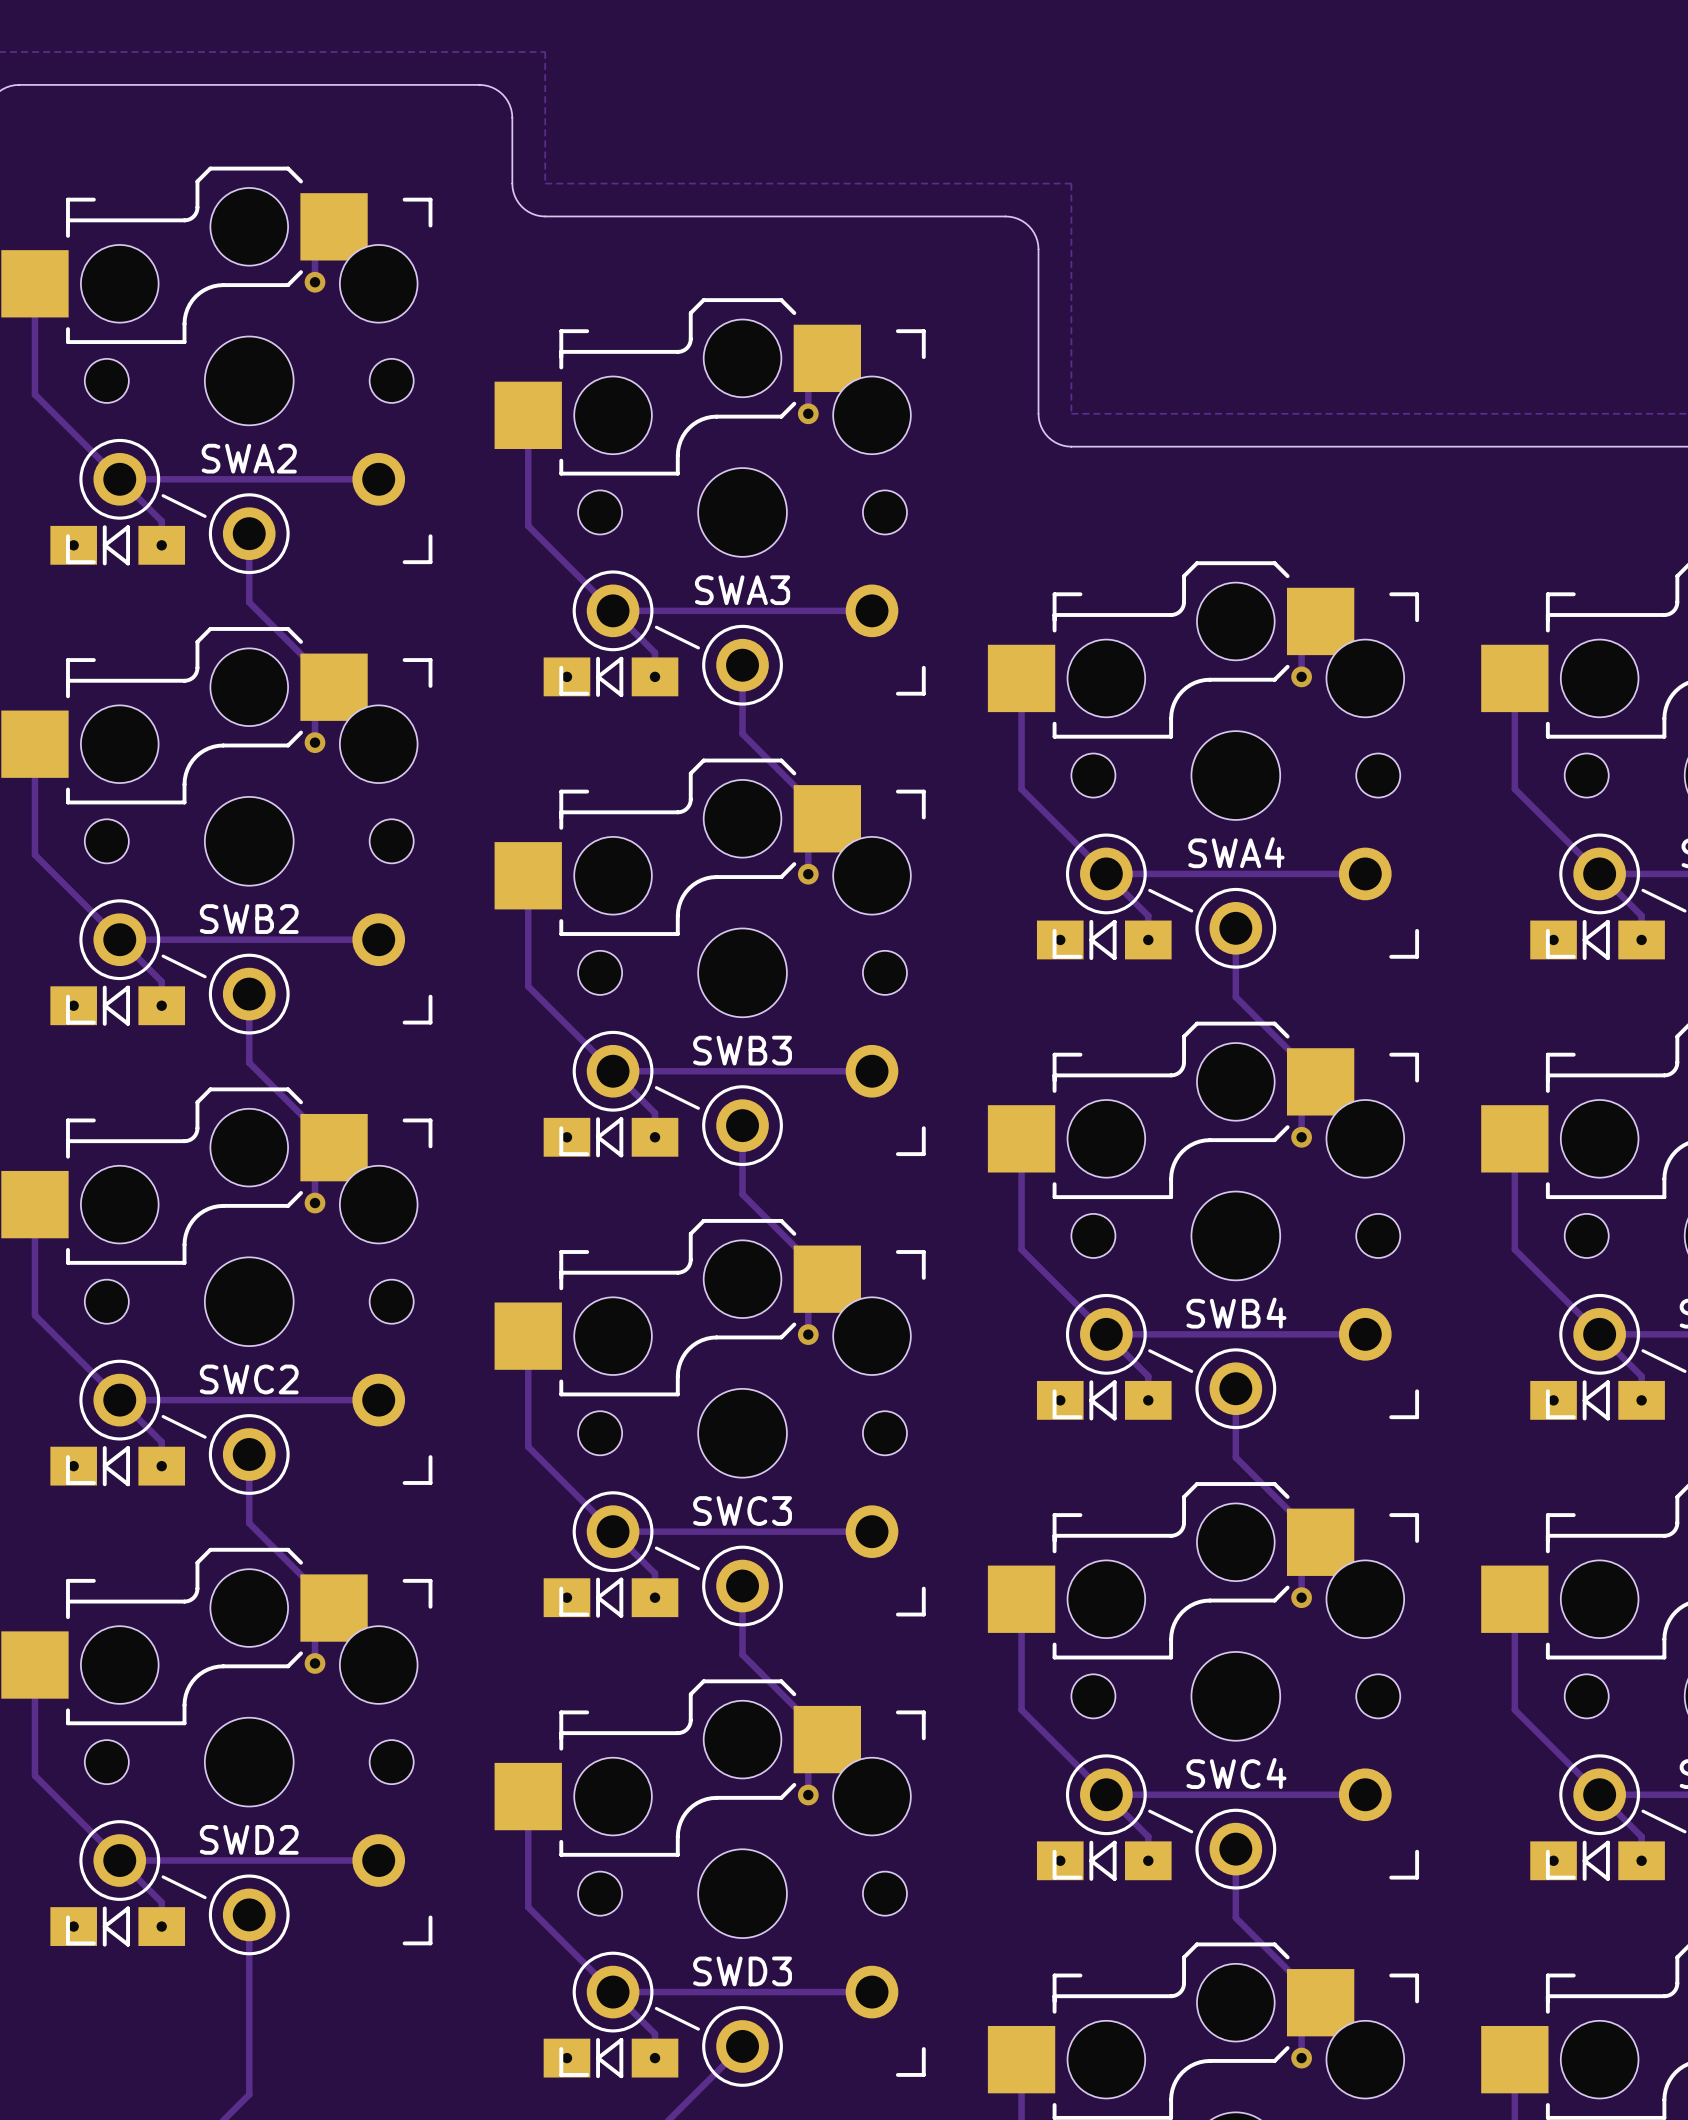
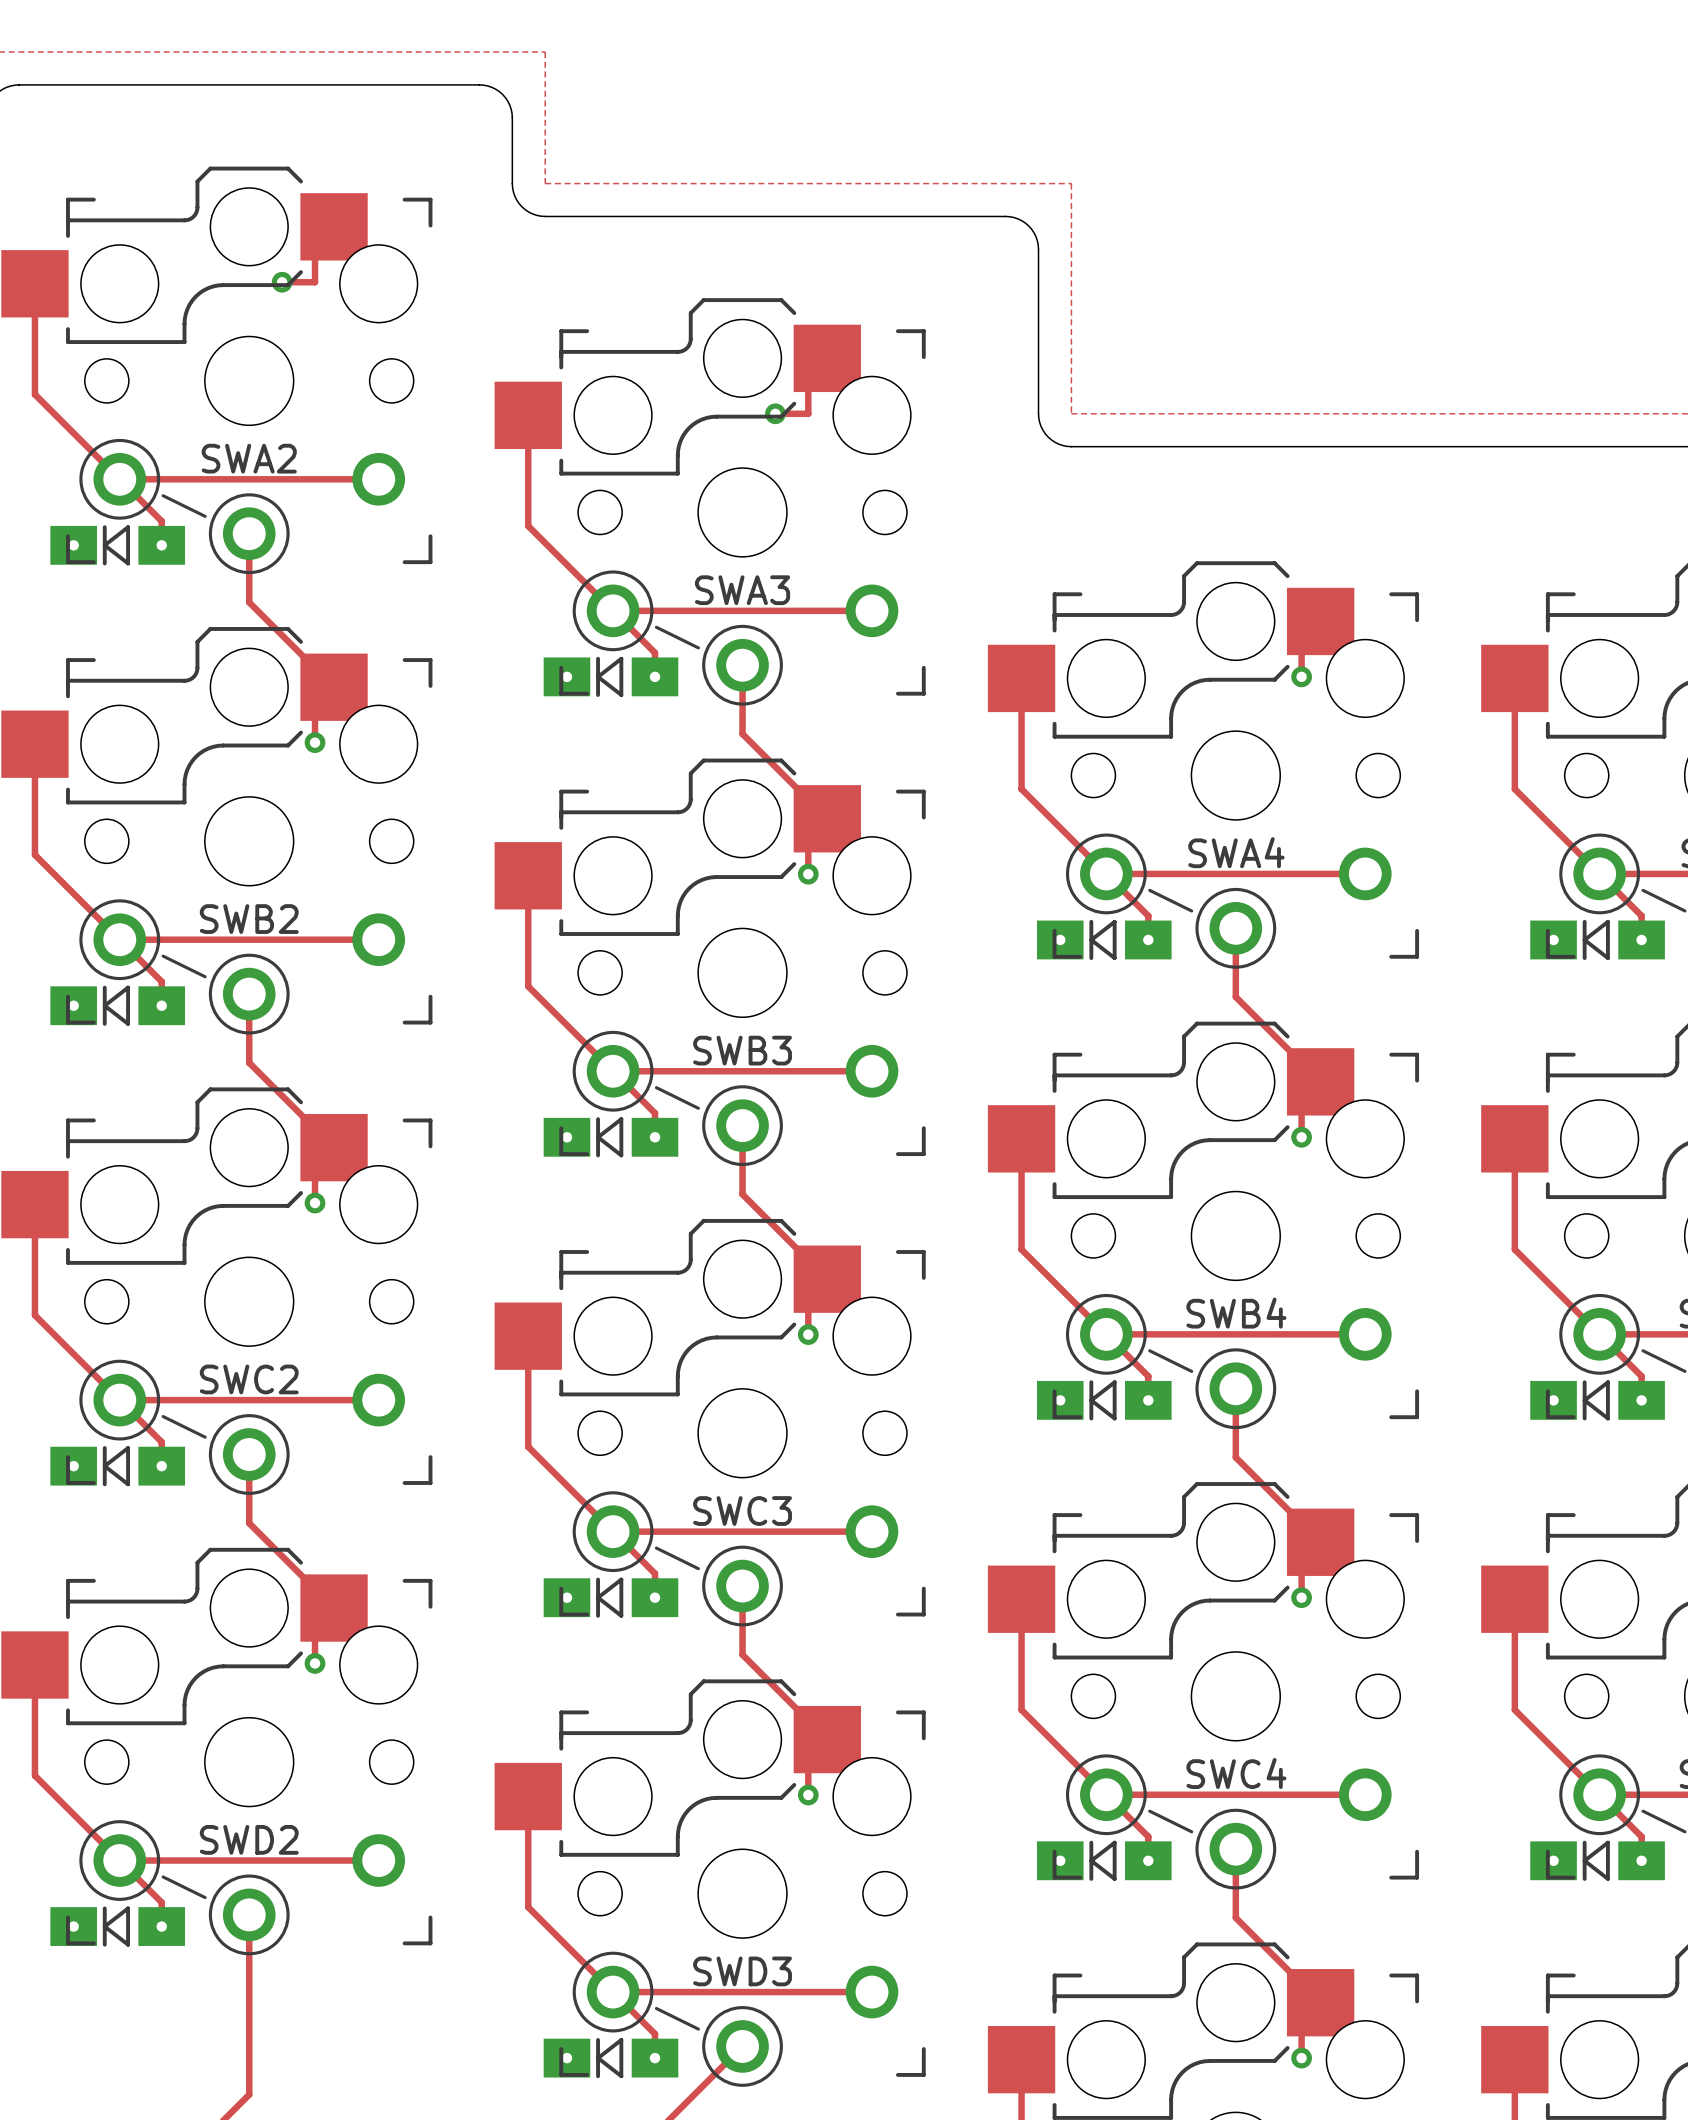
track: none -> (282, 282) (315, 282)
via position: (315, 282) -> (282, 282)
track: none -> (775, 413) (808, 413)
via position: (808, 413) -> (775, 413)

